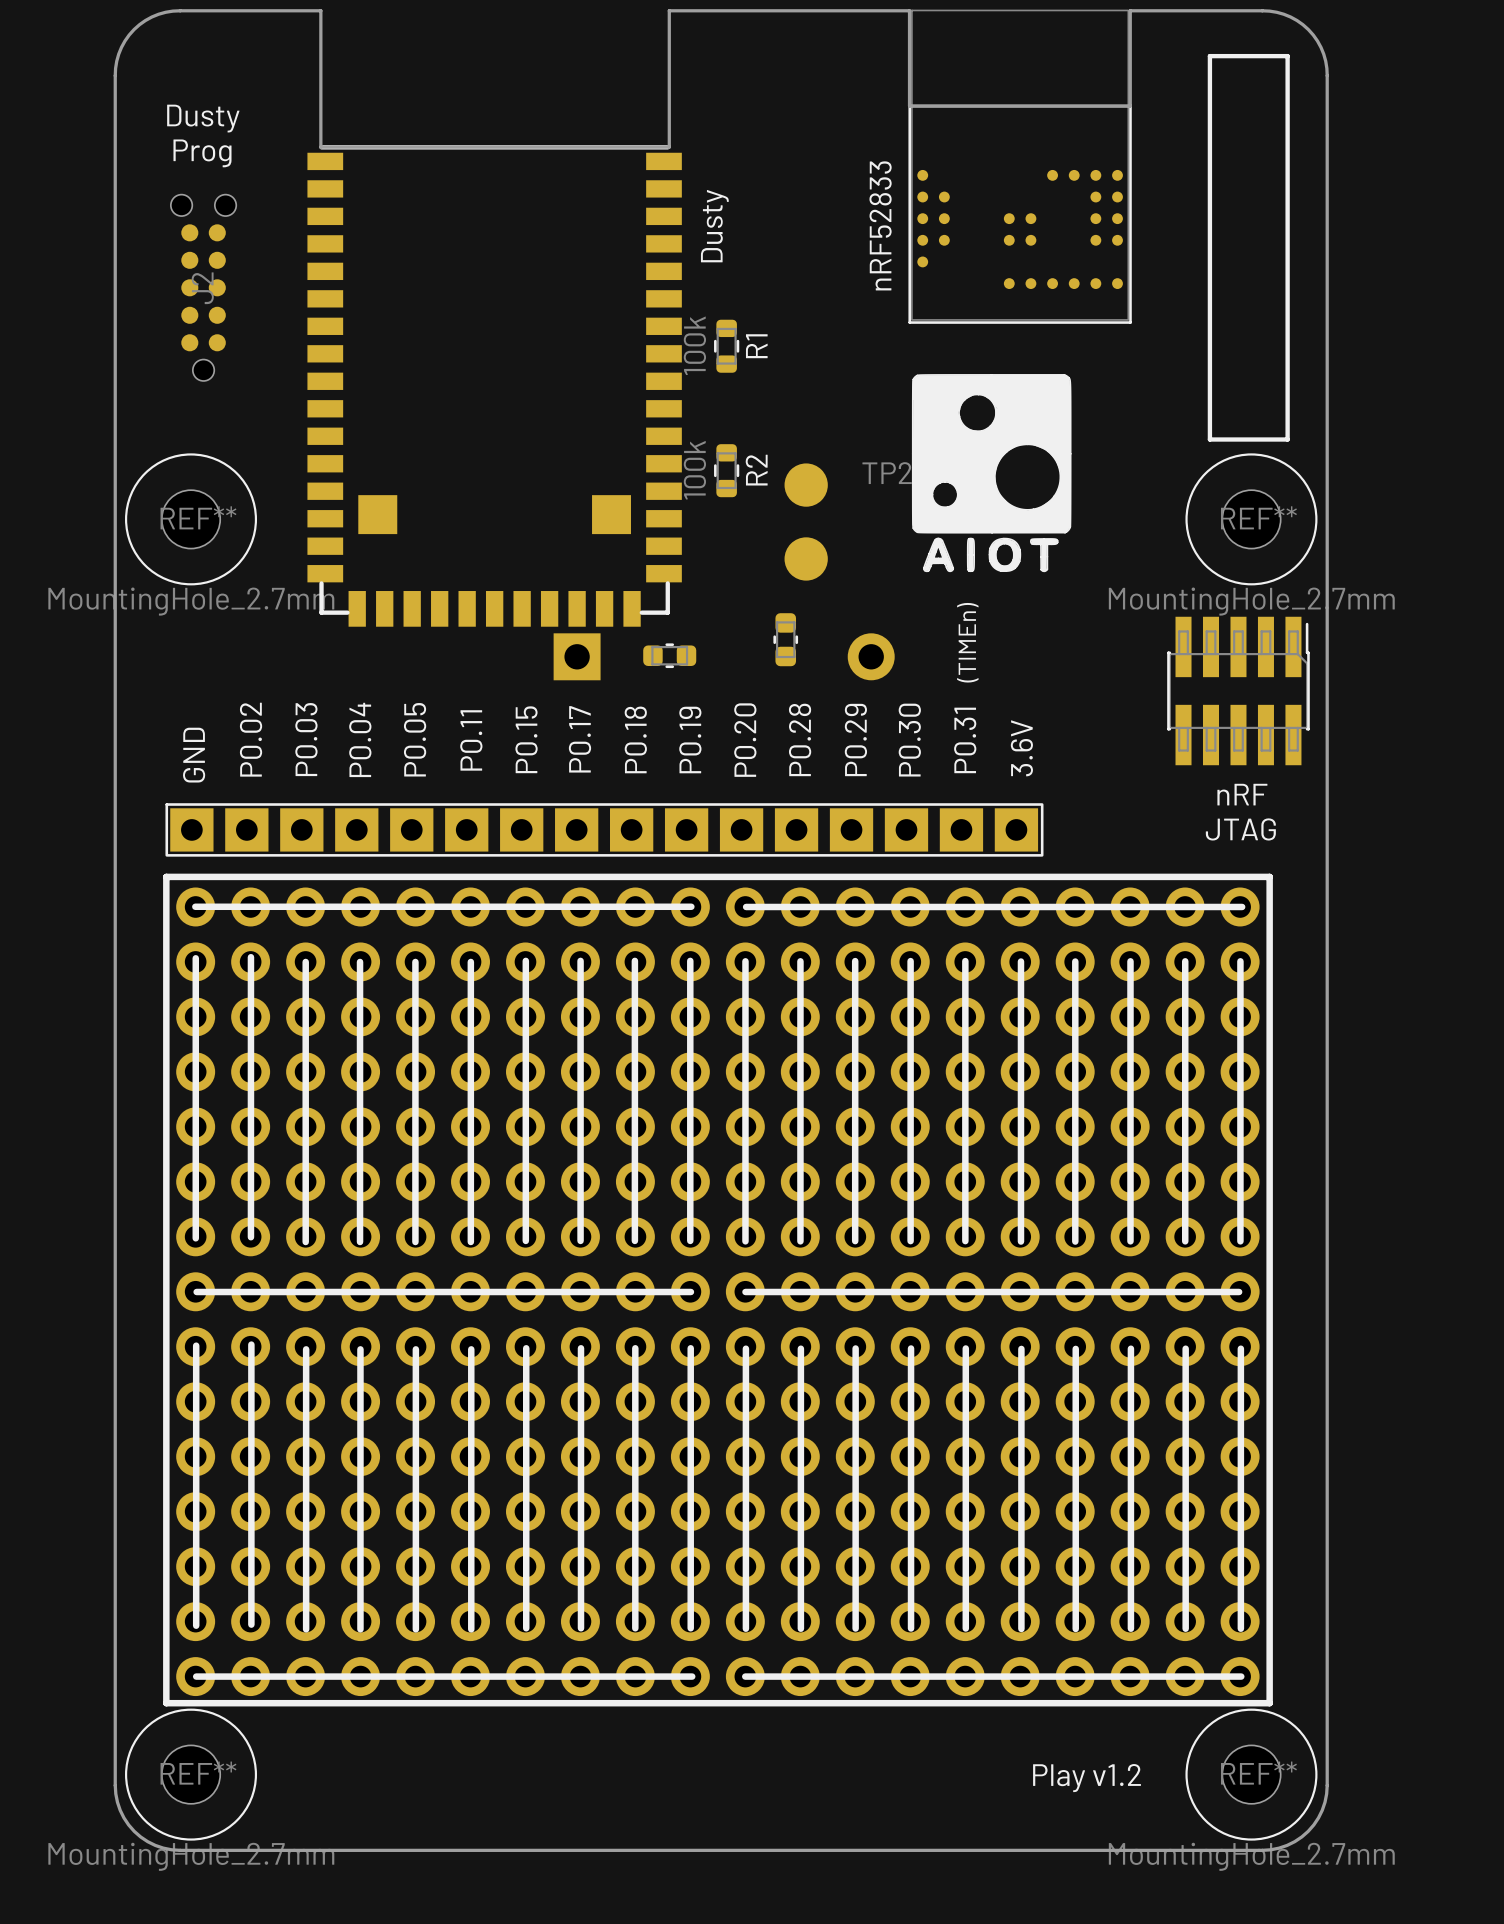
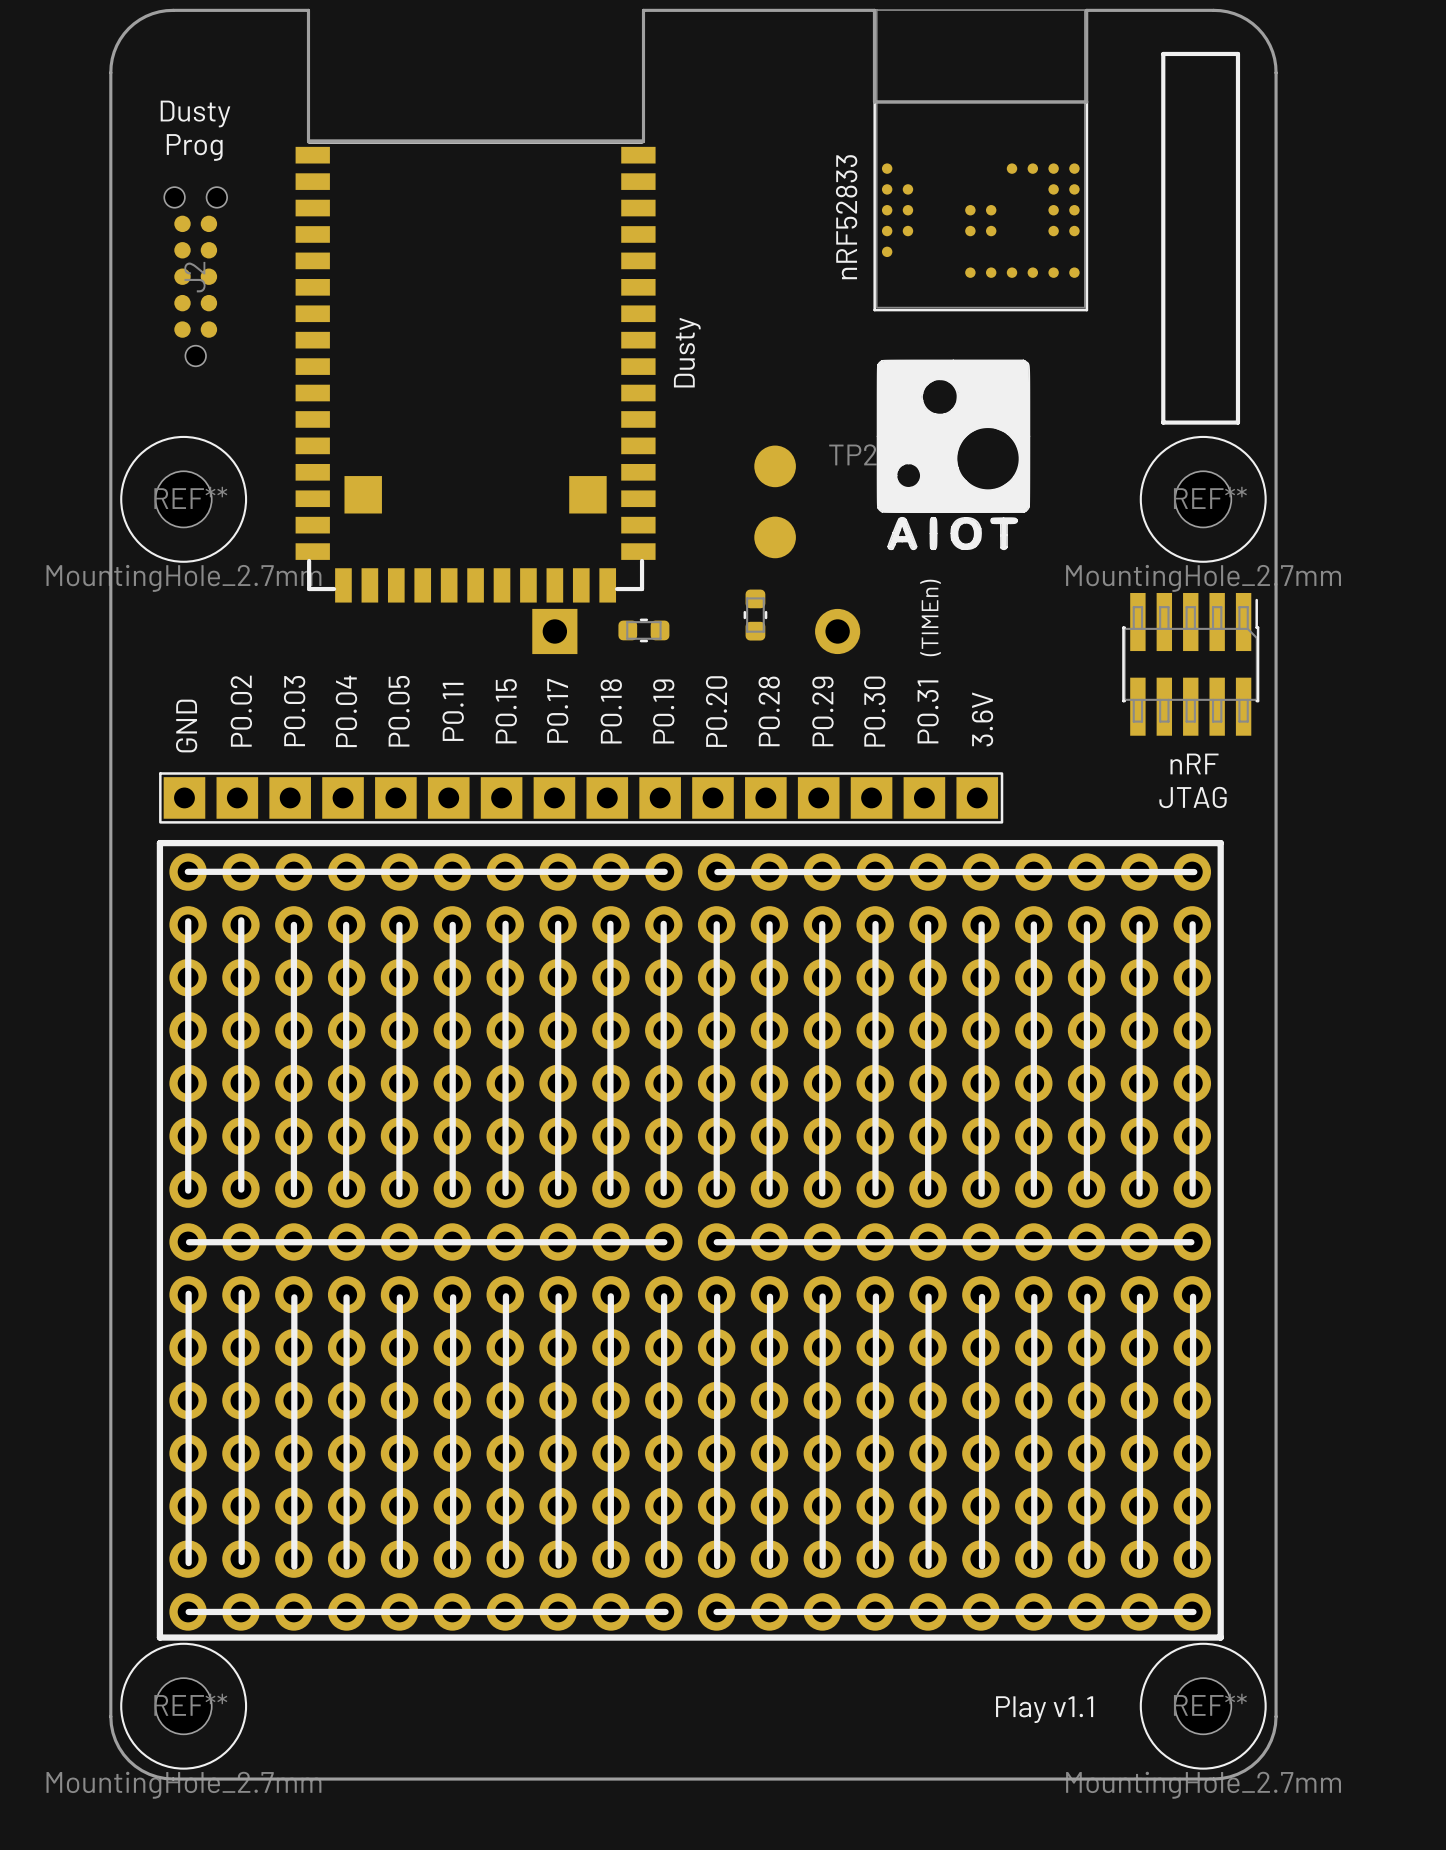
text position: Dusty (714, 226) -> Dusty (687, 352)
R1: 100k (726, 346) -> none
R2: 100k (726, 470) -> none
text: Play v1.2 (1087, 1778) -> Play v1.1 (1044, 1709)

